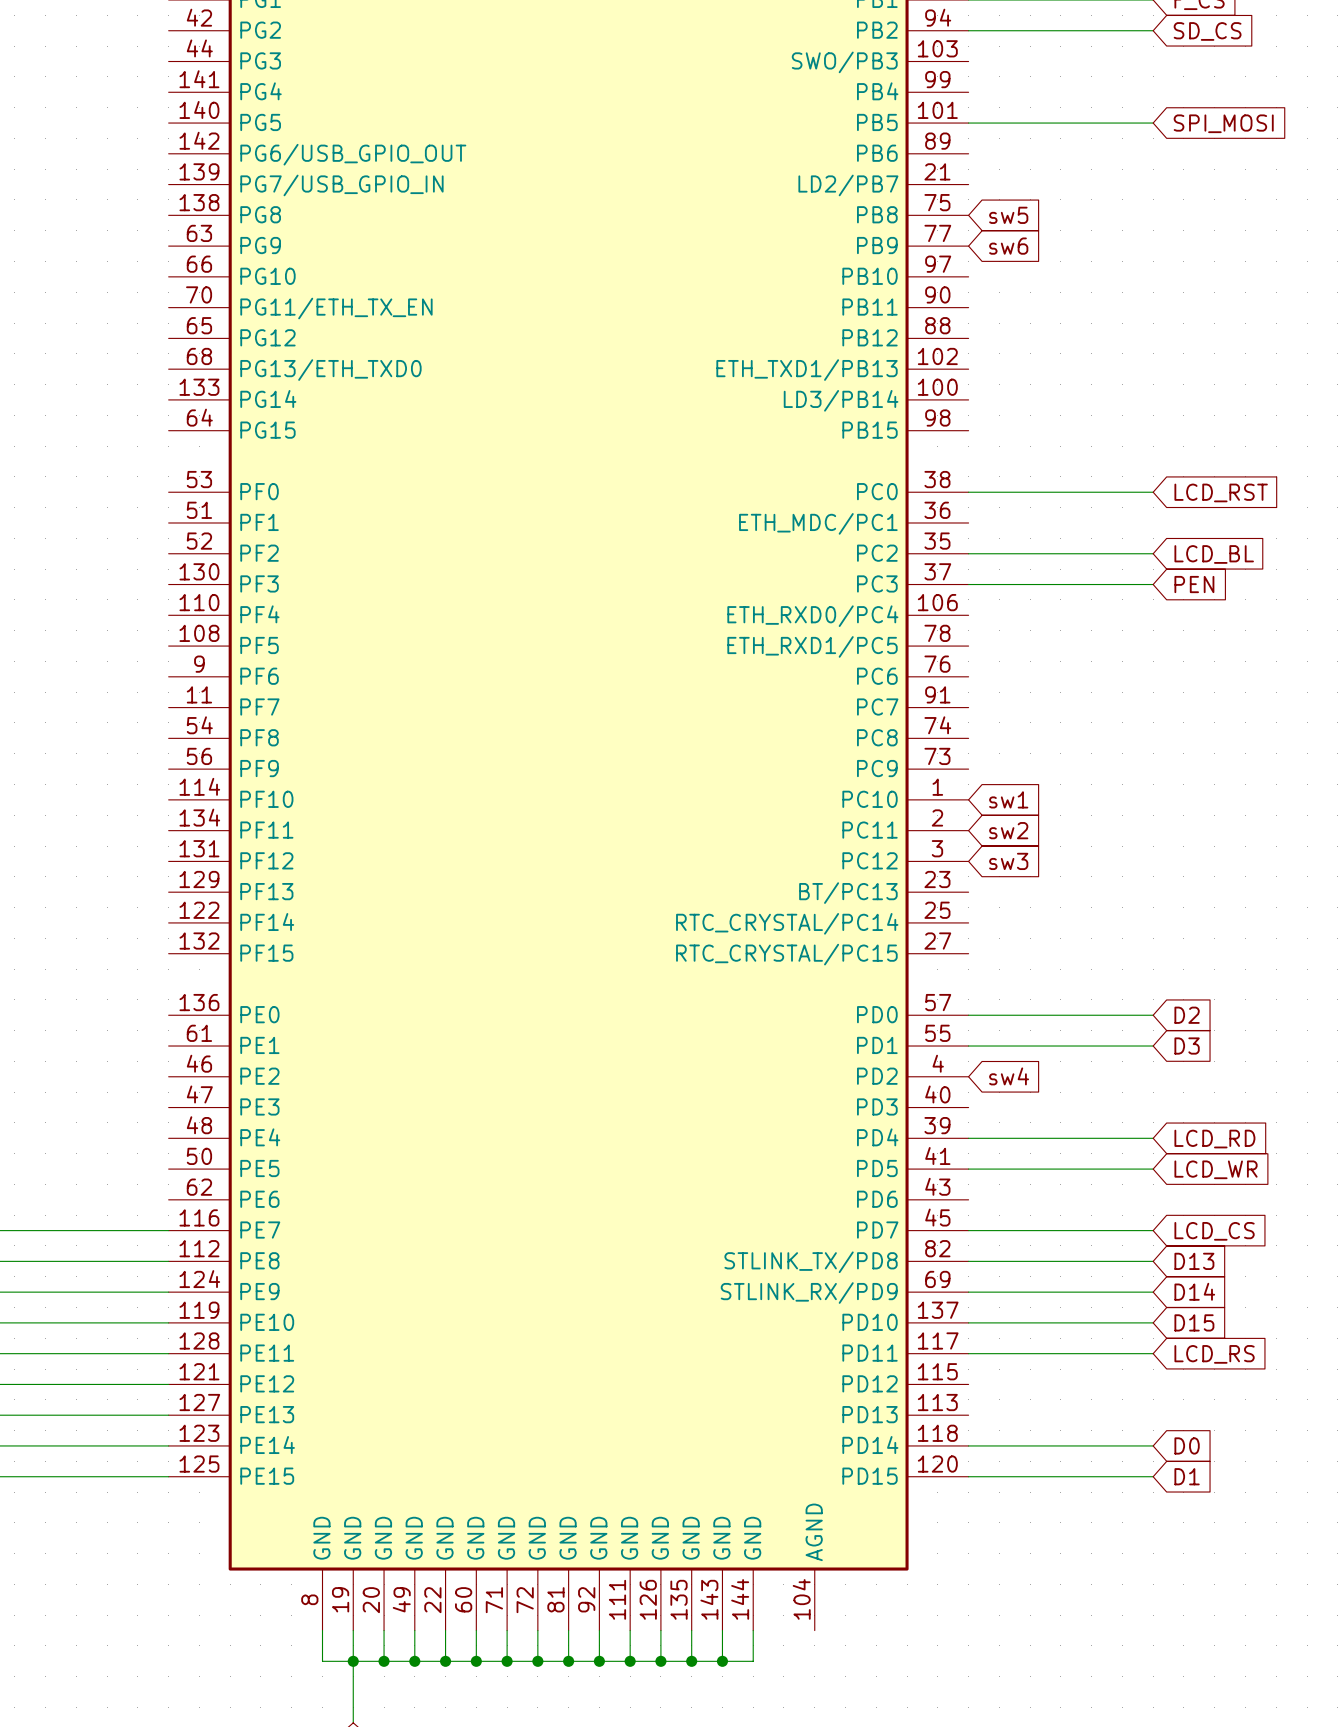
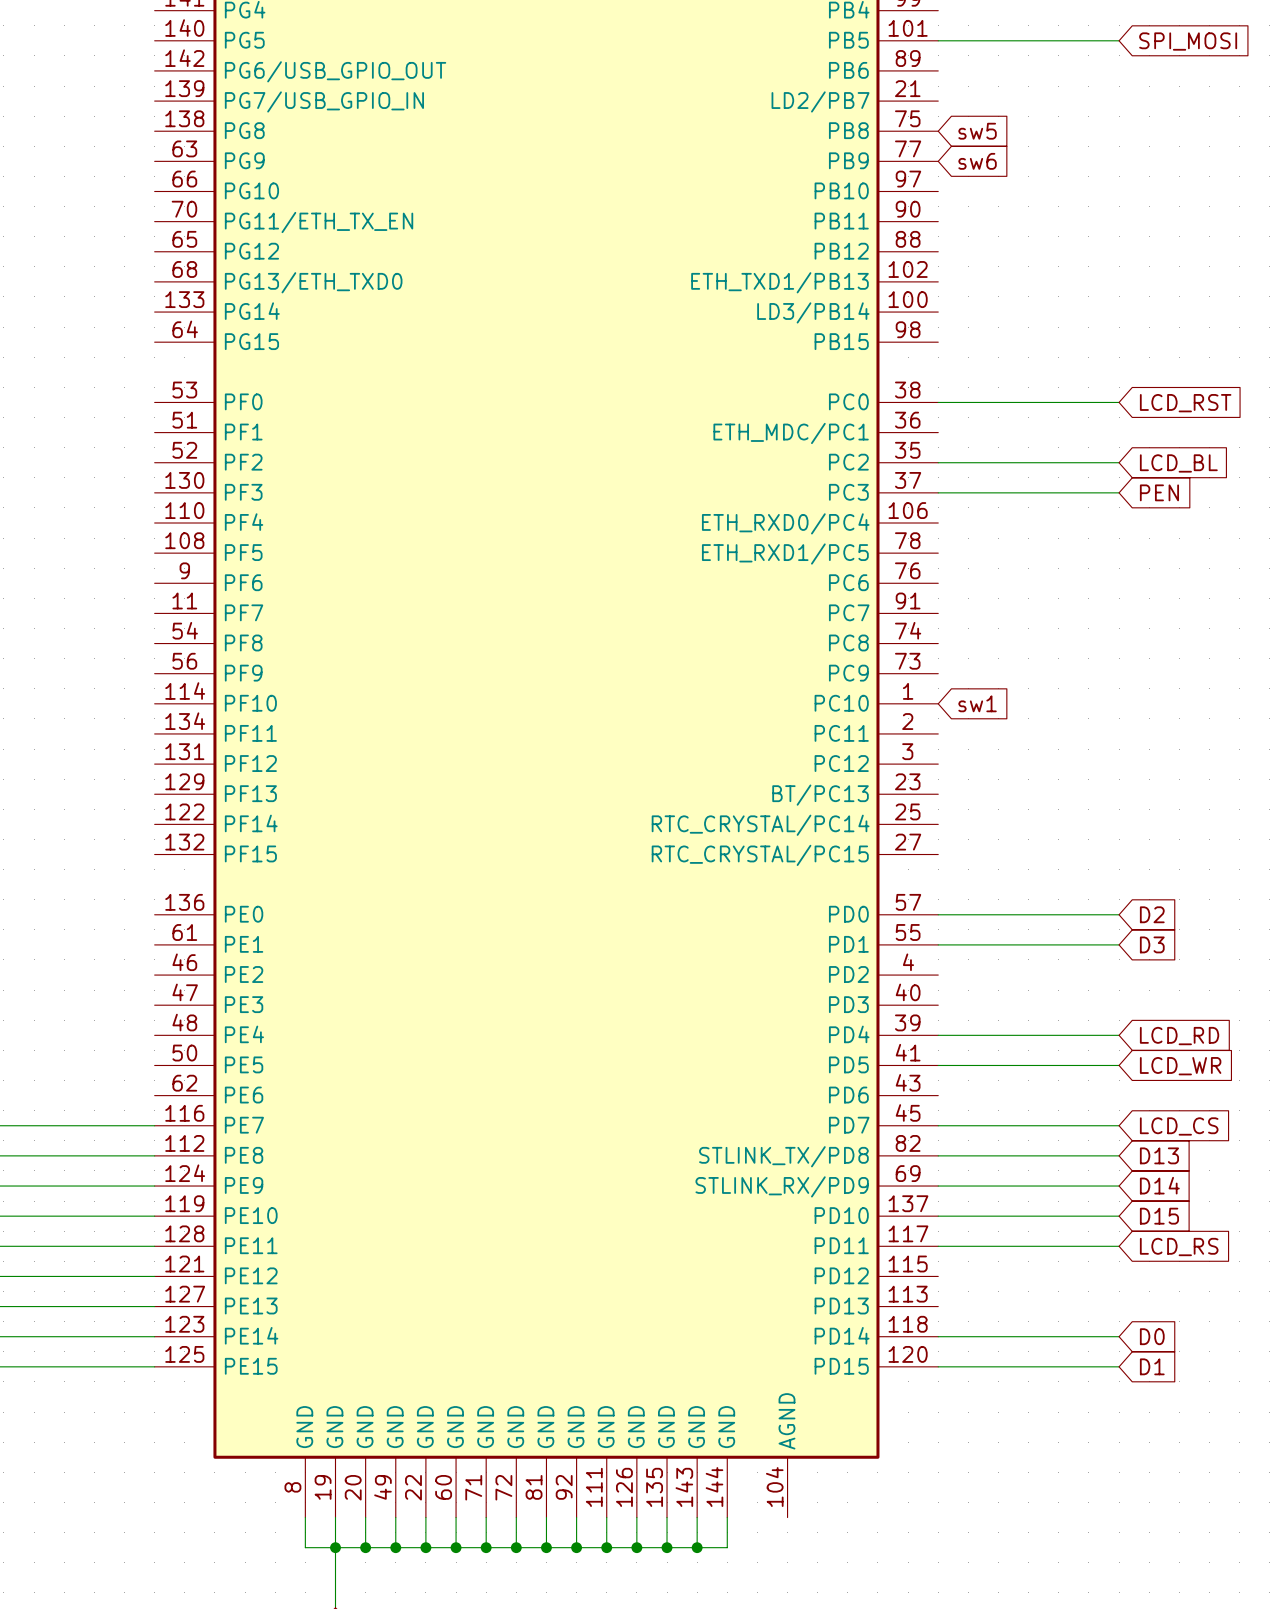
global label: sw2 (1008, 830) -> none
global label: sw3 (1008, 861) -> none
global label: sw4 (1009, 1076) -> none

